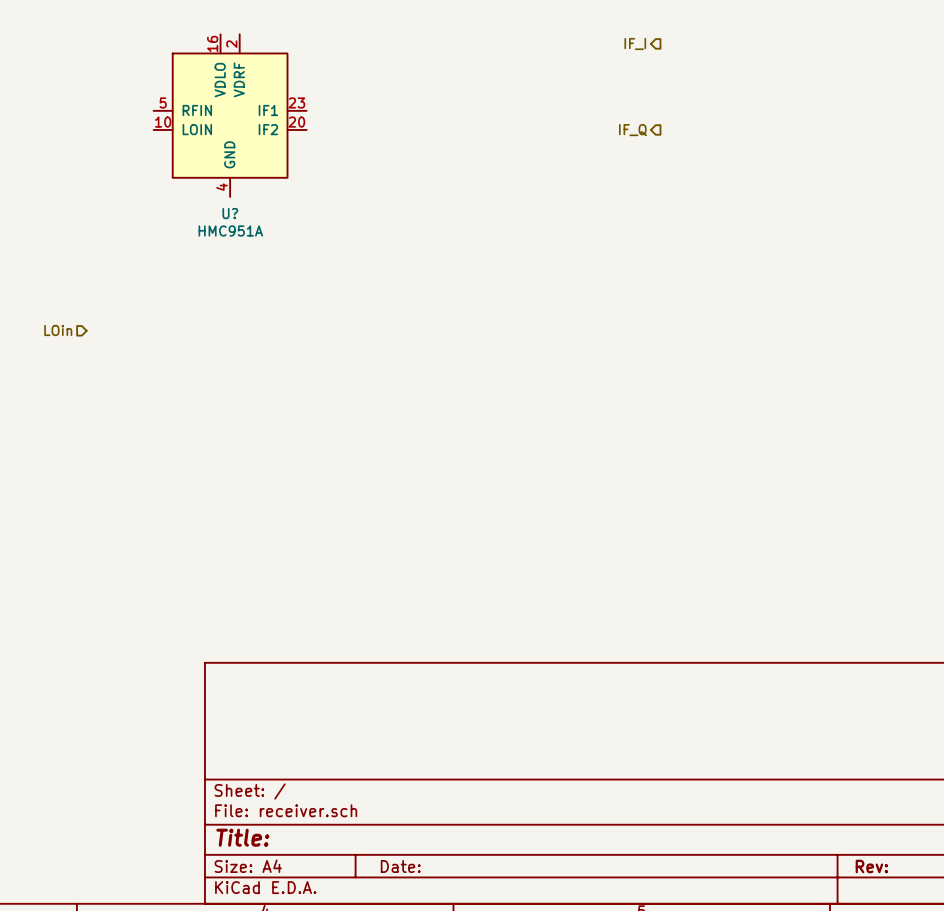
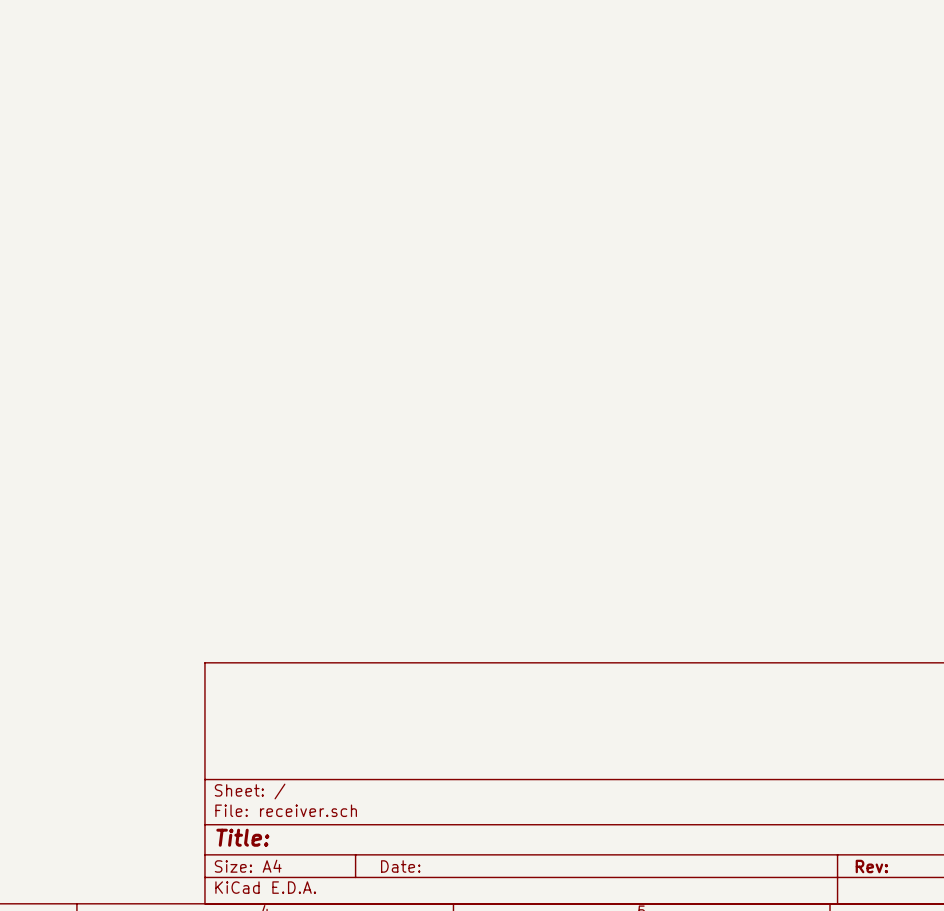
hierarchical label: IF_I (635, 44) -> none
U?: HMC951A (230, 115) -> none
hierarchical label: IF_Q (633, 130) -> none
hierarchical label: LOin (58, 330) -> none

